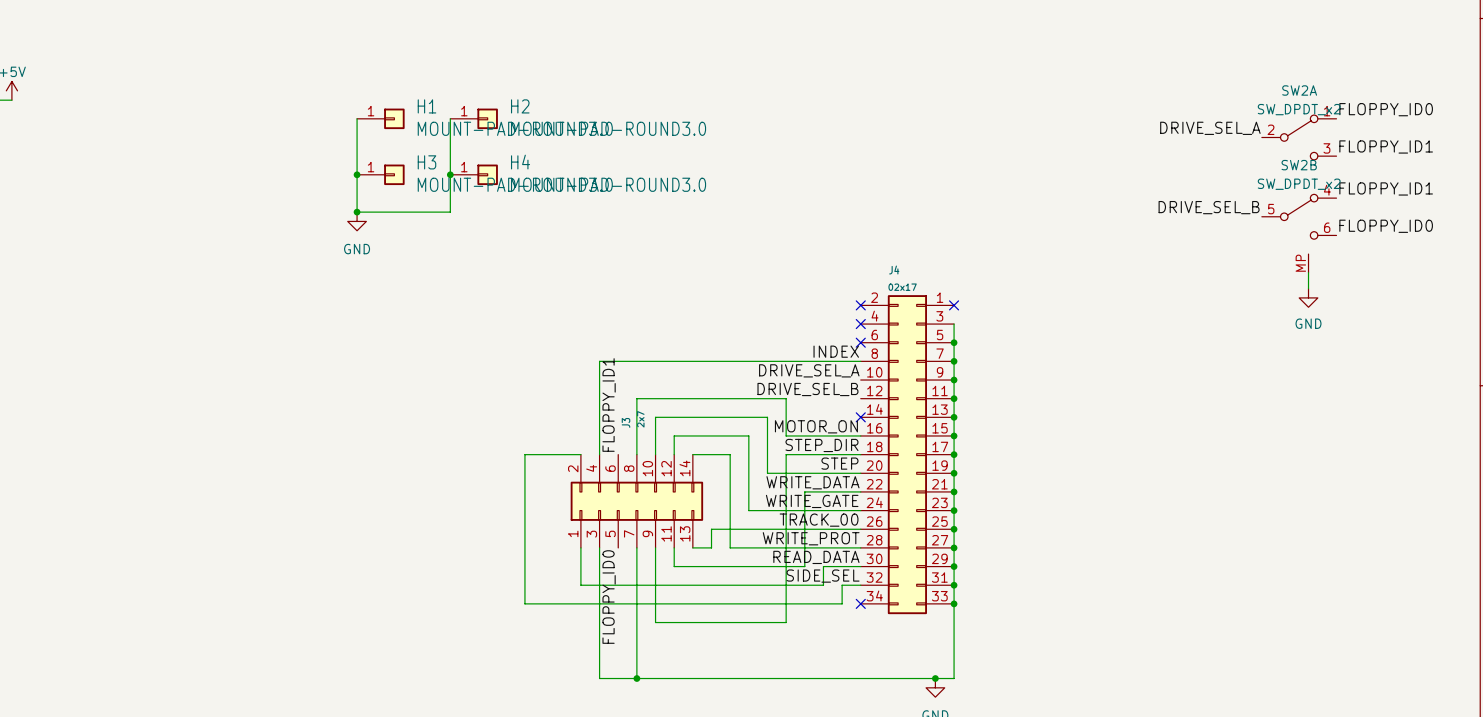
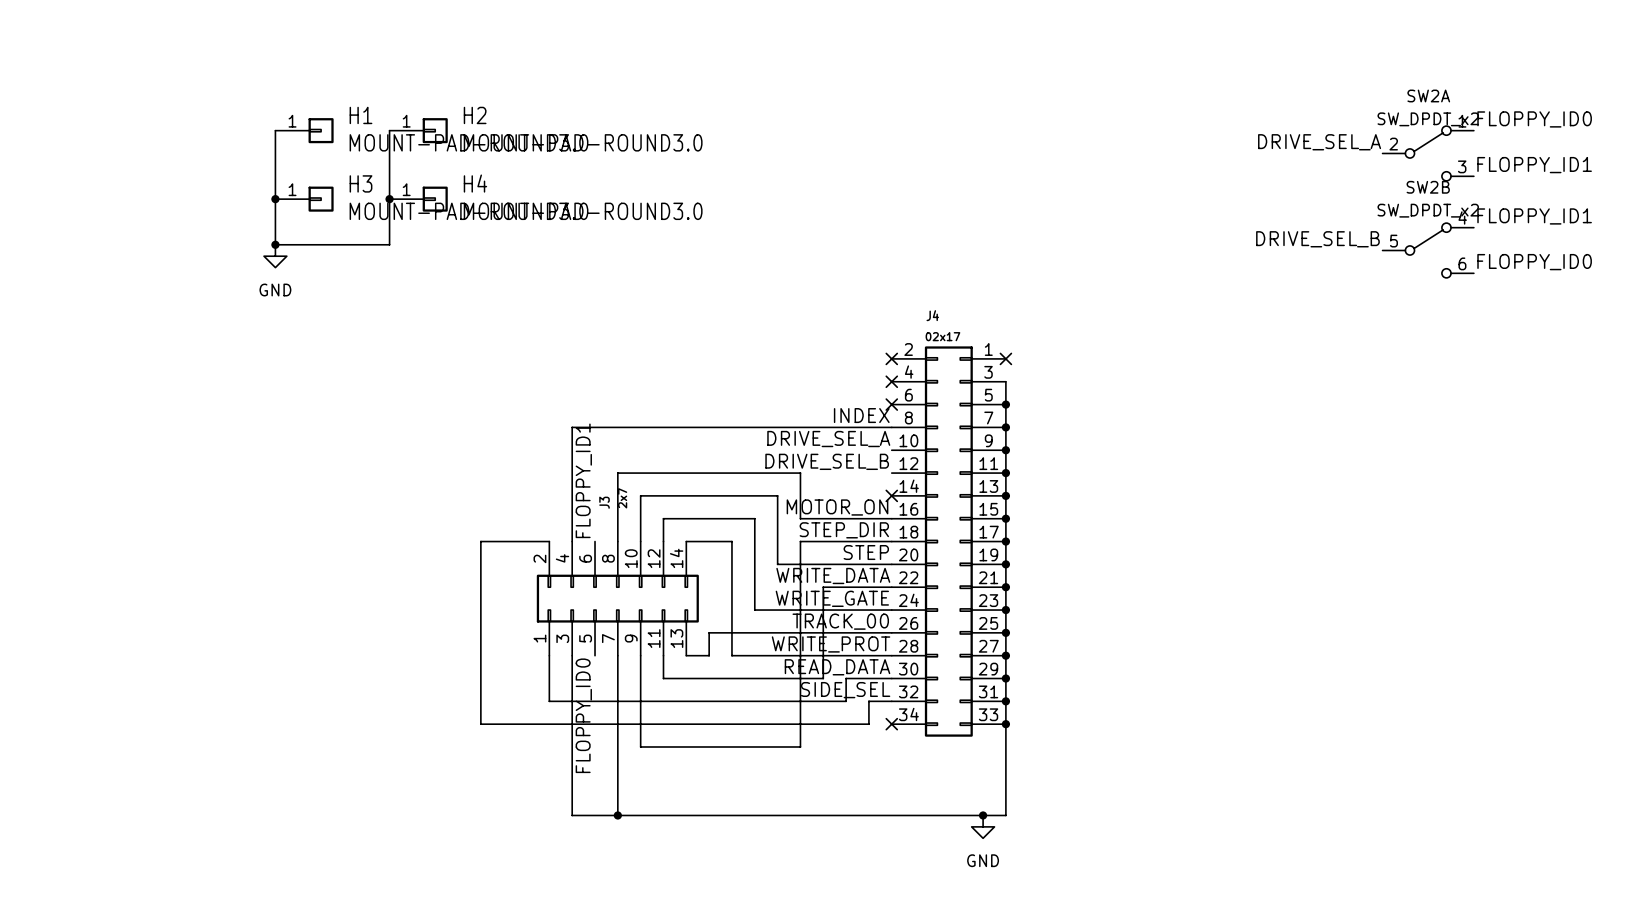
SW2B symbol: [1261, 194, 1337, 273] -> [1382, 223, 1474, 278]
wire: (1308, 272) (1308, 288) -> none
power symbol: GND (1308, 297) -> none

